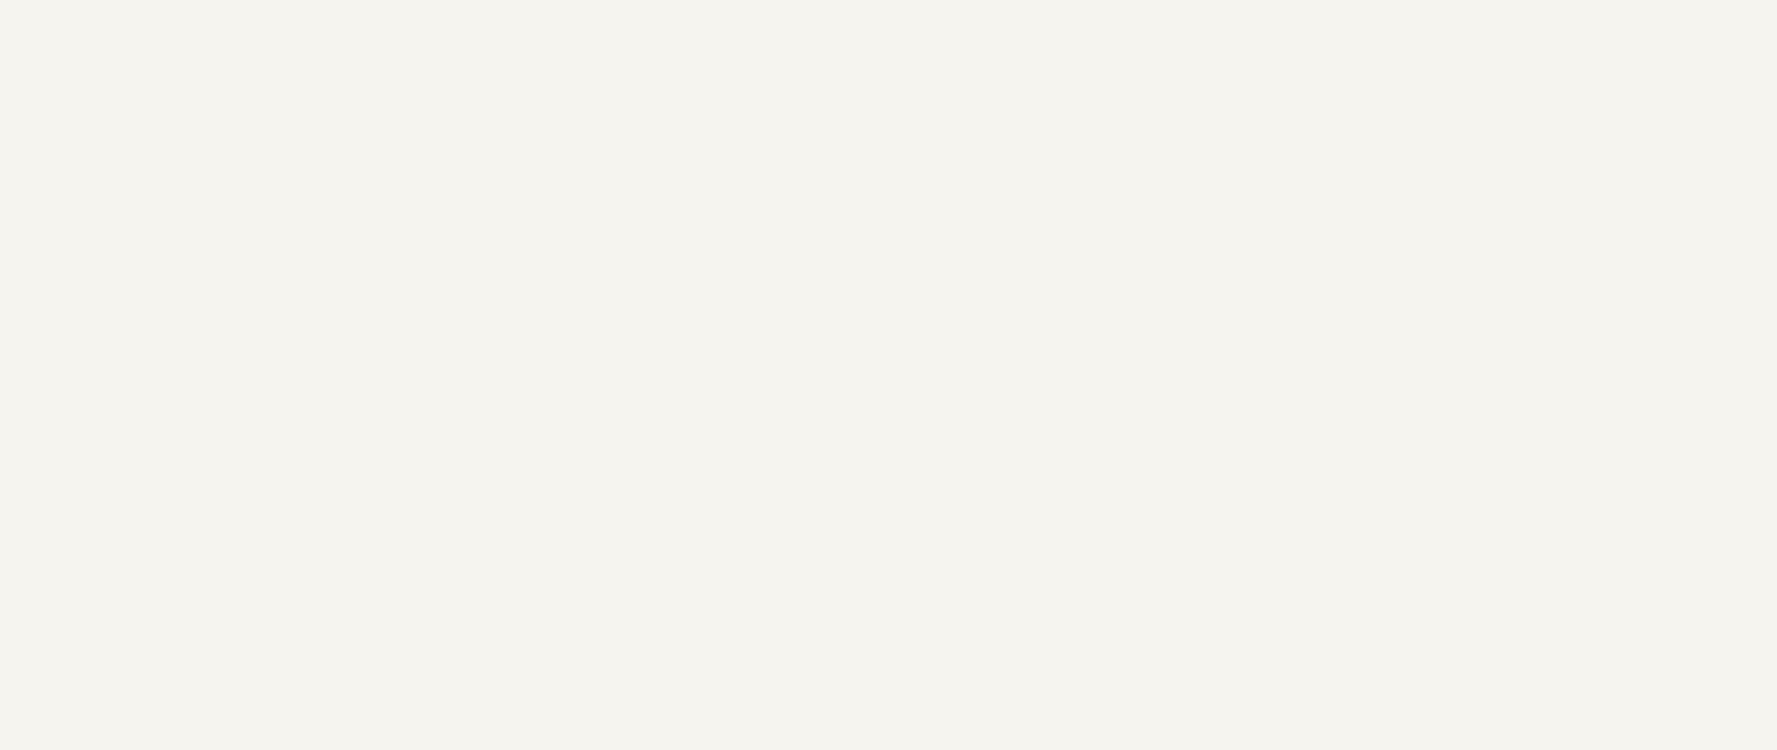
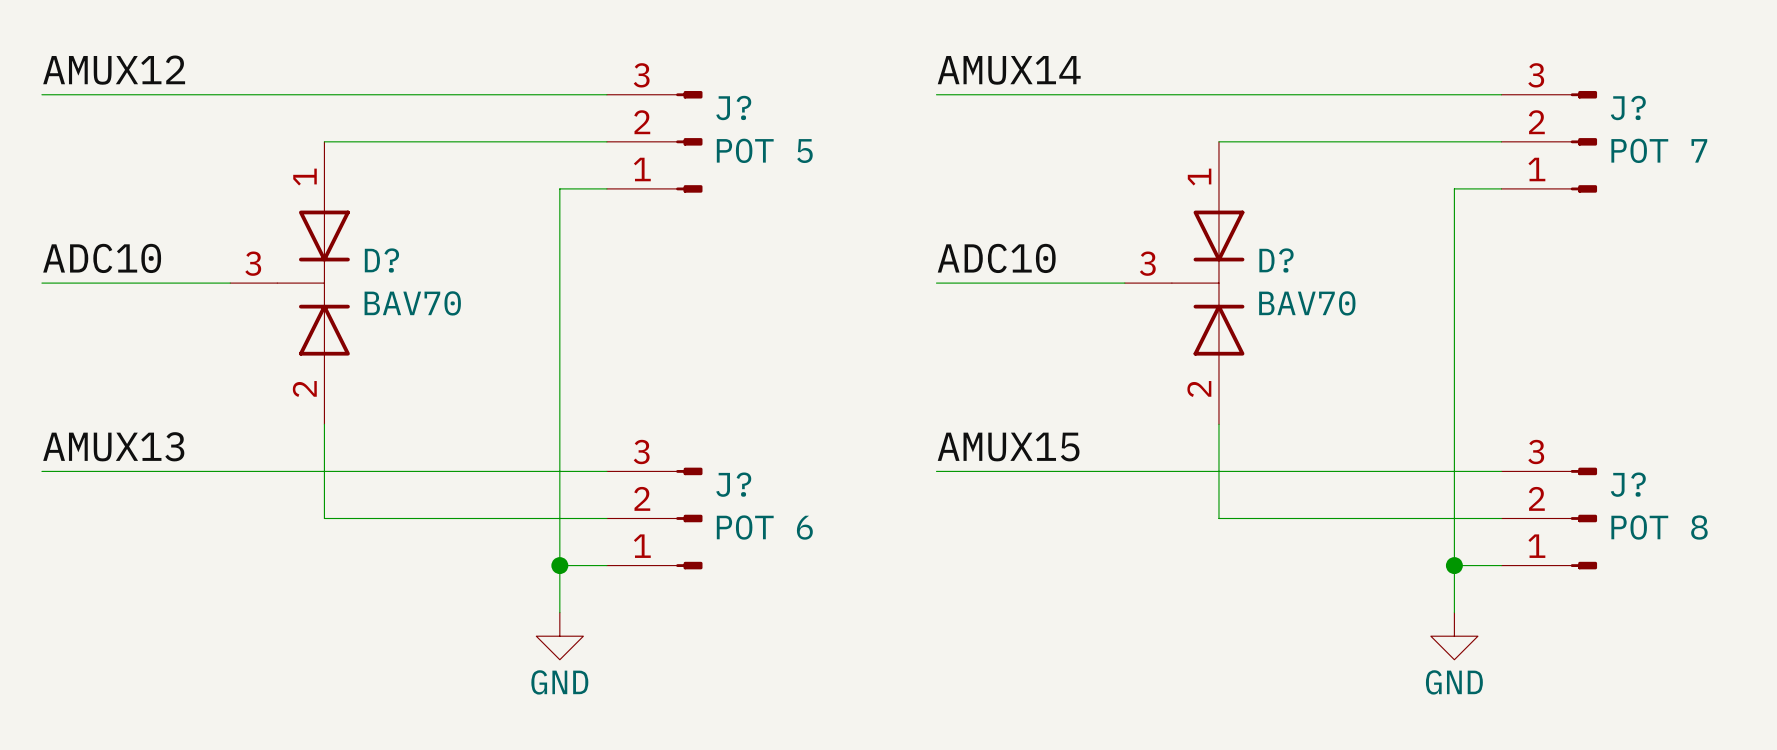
label: none -> AMUX12 (114, 70)
label: none -> AMUX14 (1009, 70)
wire: none -> (41, 94) (606, 94)
wire: none -> (936, 94) (1501, 94)
wire: none -> (324, 141) (606, 141)
J?: none -> POT 5 (654, 141)
wire: none -> (1218, 141) (1501, 141)
J?: none -> POT 7 (1549, 141)
wire: none -> (606, 188) (559, 188) (559, 612)
wire: none -> (1501, 188) (1454, 188) (1454, 612)
label: none -> ADC10 (102, 258)
label: none -> ADC10 (996, 258)
wire: none -> (41, 283) (230, 283)
D?: none -> BAV70 (290, 283)
wire: none -> (936, 283) (1124, 283)
D?: none -> BAV70 (1184, 283)
wire: none -> (324, 424) (324, 518) (606, 518)
wire: none -> (1218, 424) (1218, 518) (1501, 518)
label: none -> AMUX13 (113, 446)
label: none -> AMUX15 (1008, 447)
wire: none -> (41, 471) (606, 471)
wire: none -> (936, 471) (1501, 471)
J?: none -> POT 6 (654, 518)
J?: none -> POT 8 (1549, 518)
wire: none -> (559, 565) (606, 565)
junction: none -> (559, 565)
wire: none -> (1454, 565) (1501, 565)
junction: none -> (1454, 565)
power symbol: none -> GND (559, 636)
power symbol: none -> GND (1454, 636)

